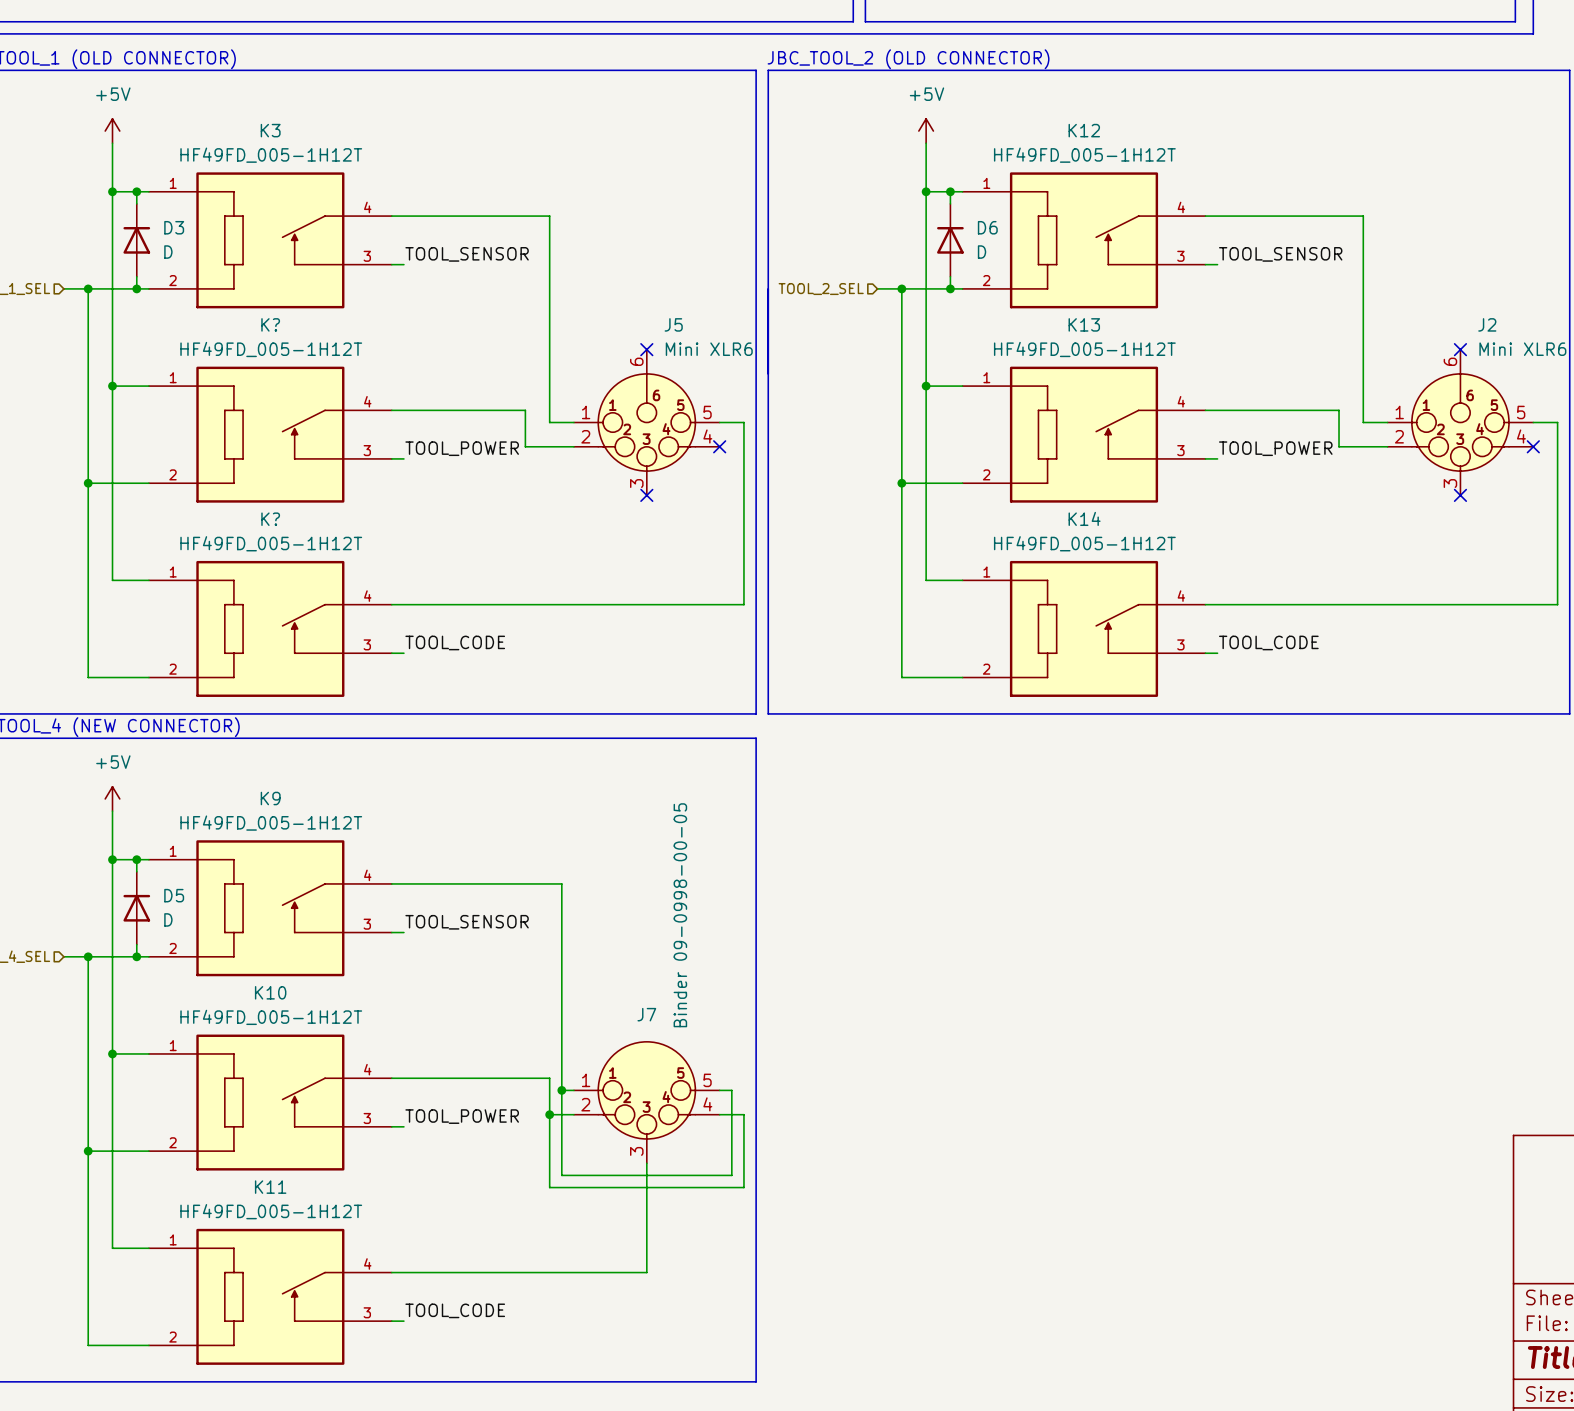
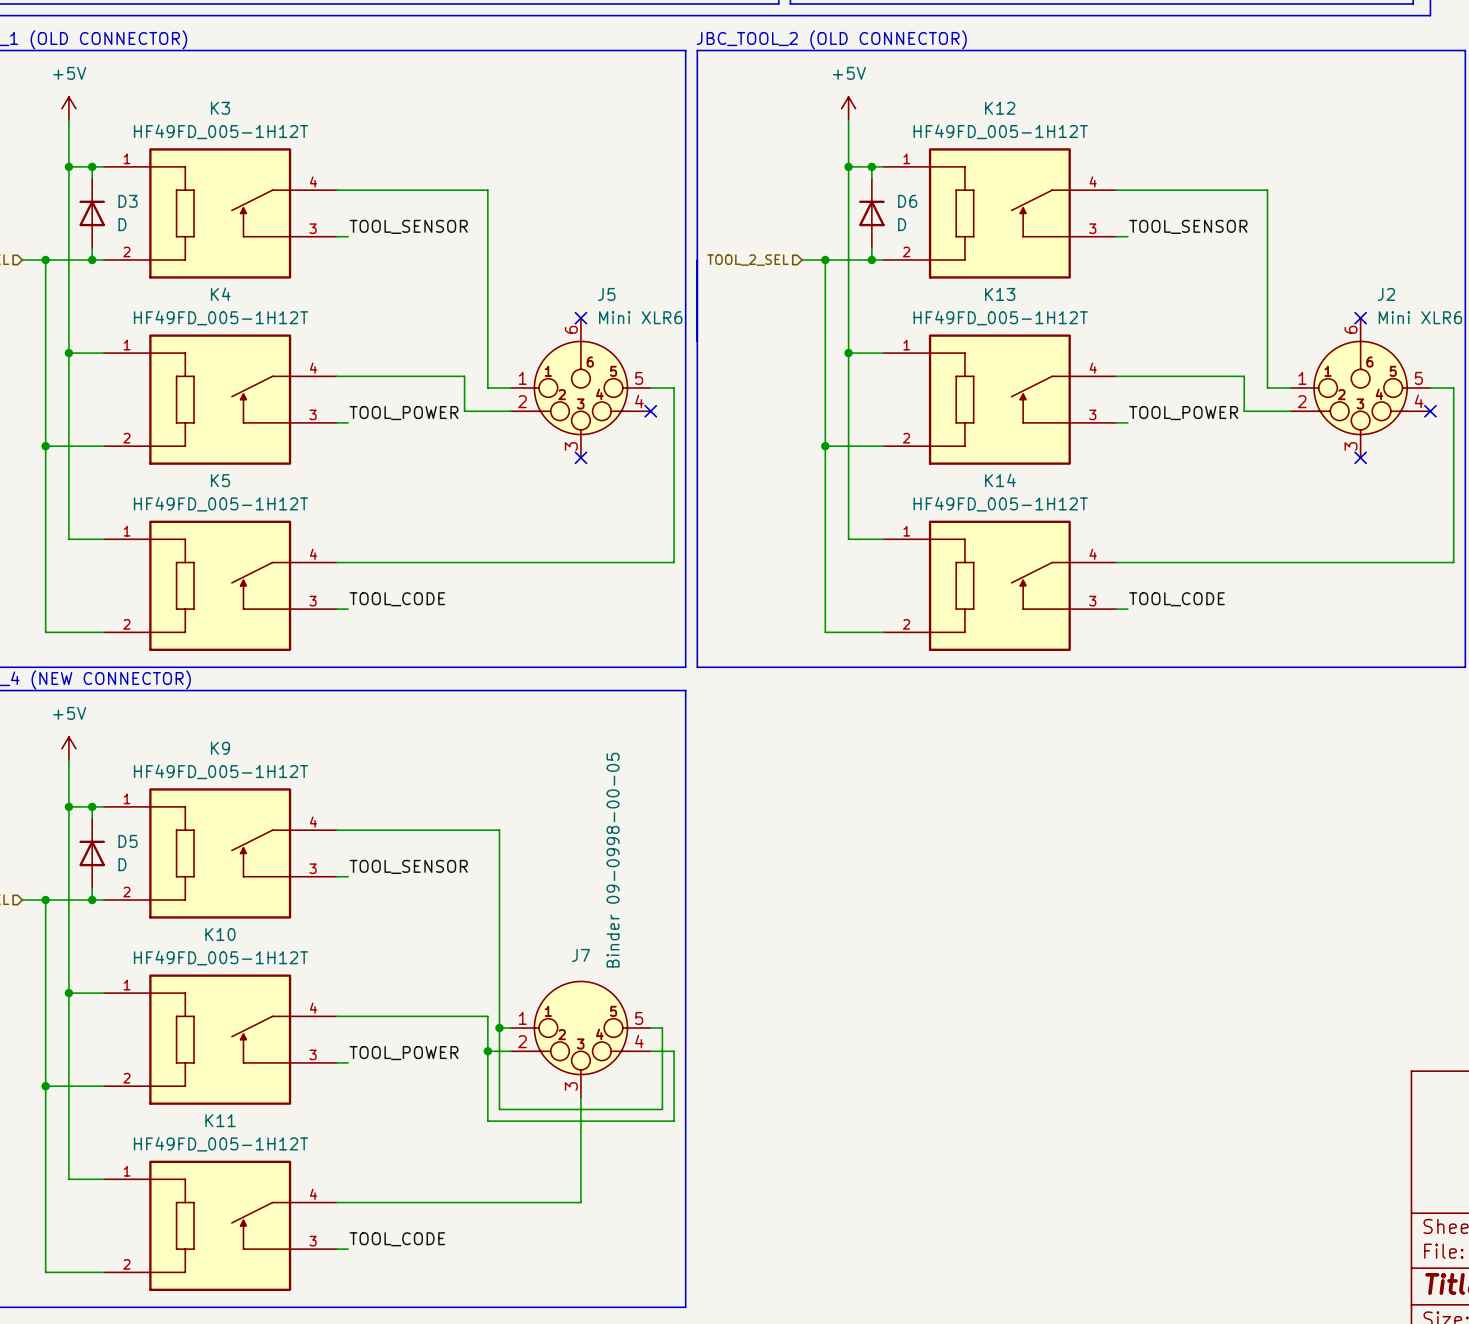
K? name: K? (270, 324) -> K4 (220, 294)
K? name: K? (270, 519) -> K5 (220, 480)

